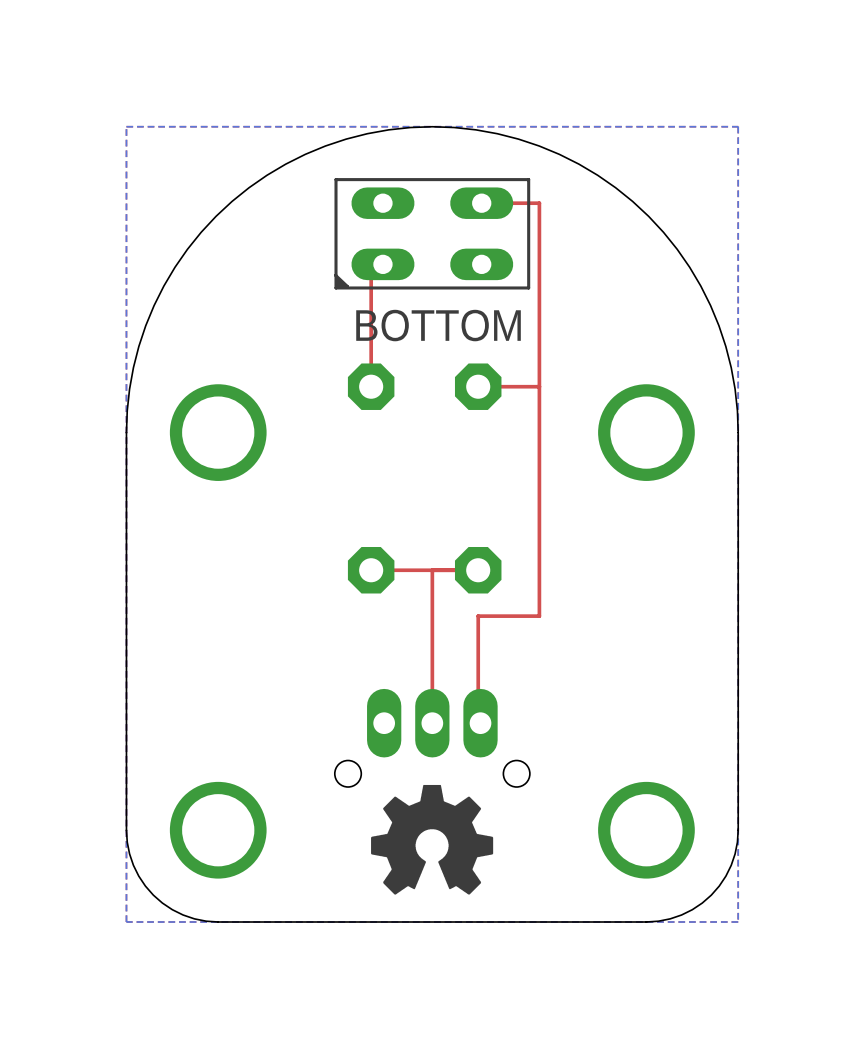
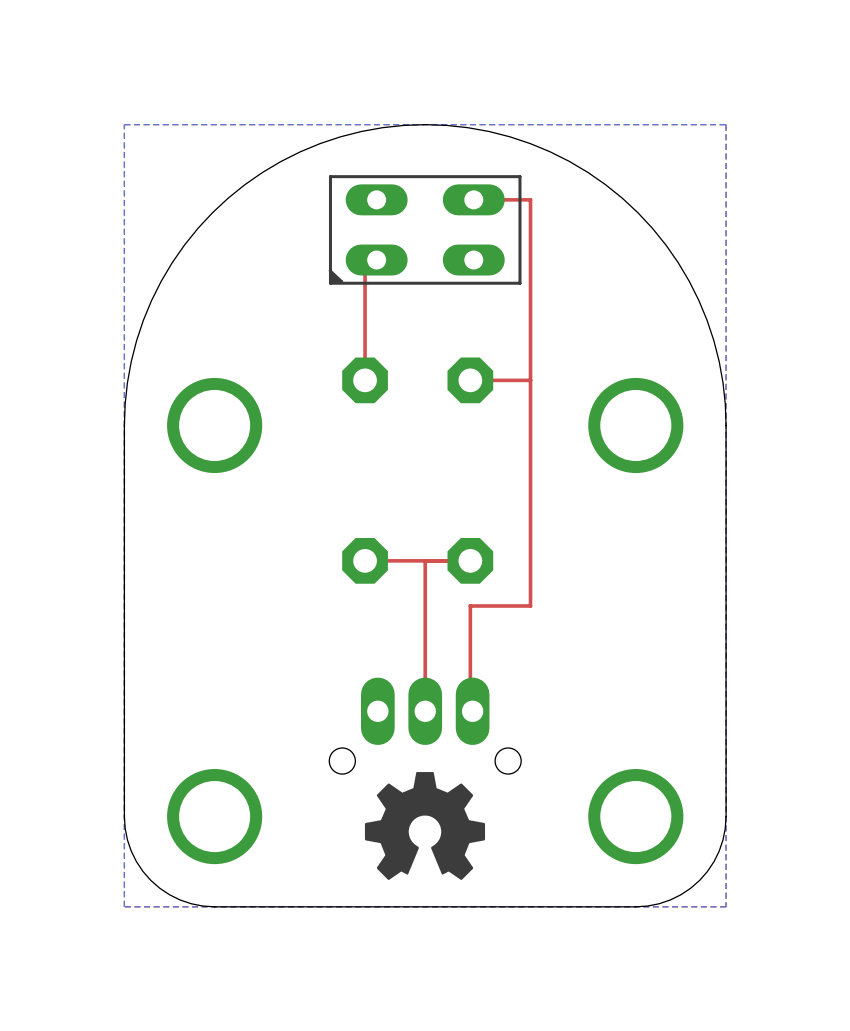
text: BOTTOM (438, 325) -> none

